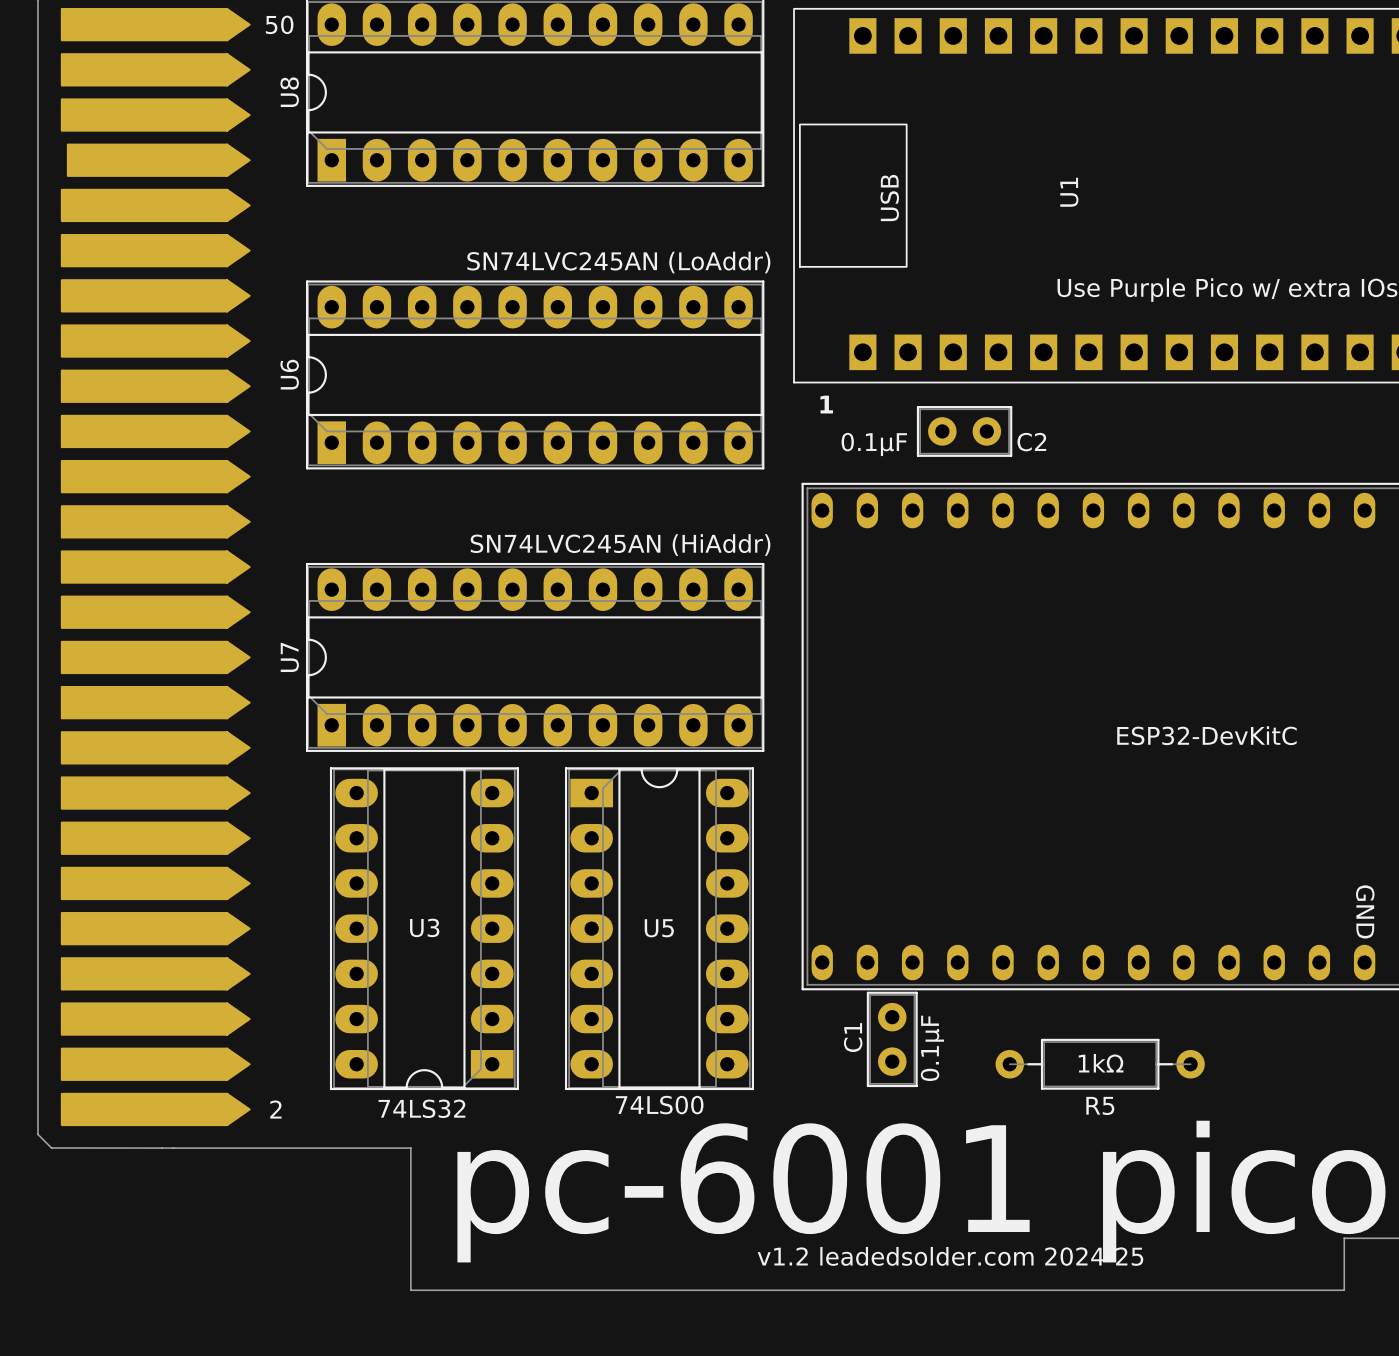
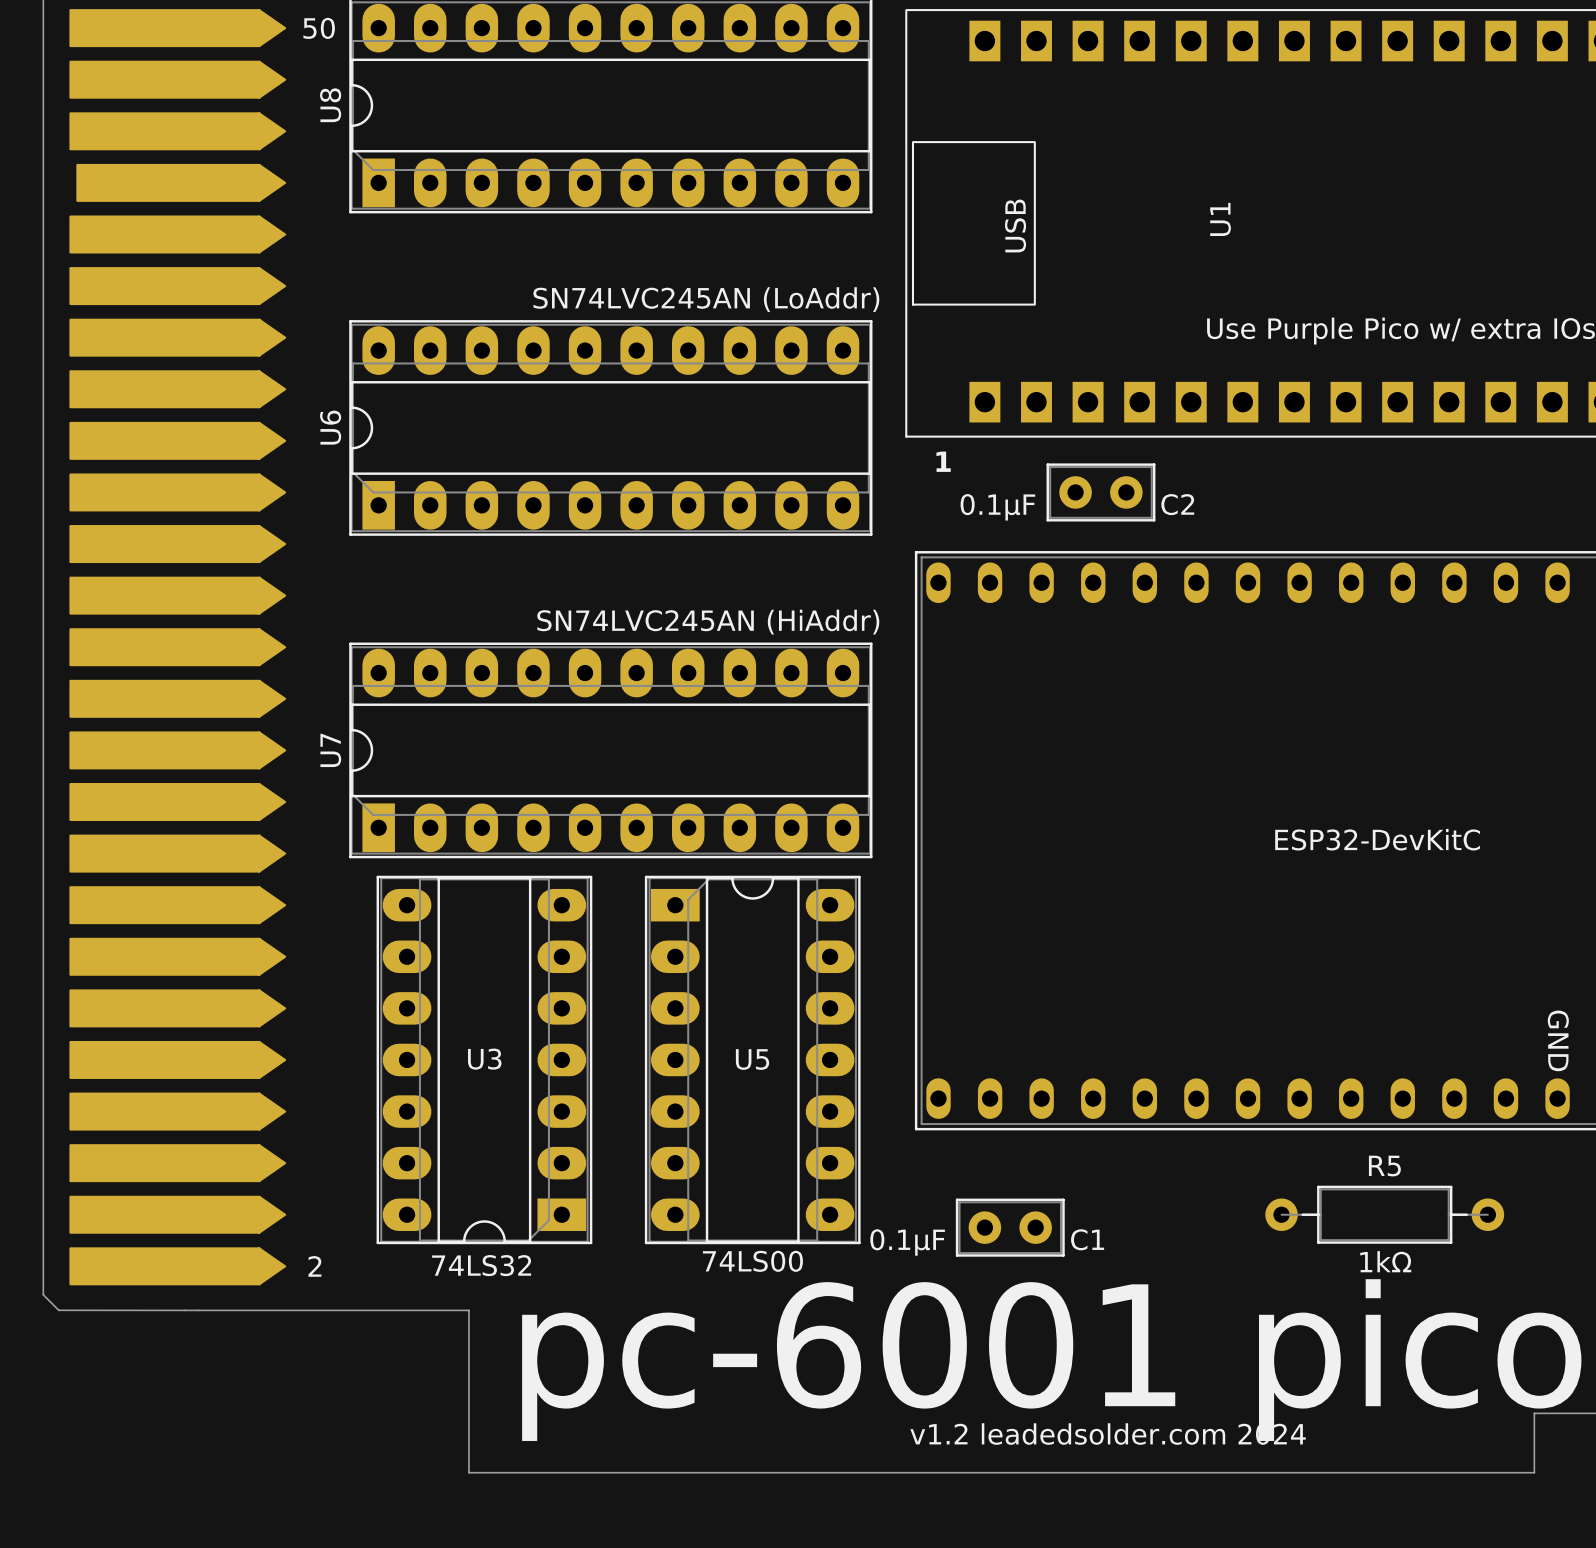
C1 name position: C1 (853, 1037) -> C1 (1087, 1239)
C1 rotation: 0° (892, 1039) -> 90° clockwise (1010, 1227)
C1 value position: 0.1µF (932, 1048) -> 0.1µF (907, 1242)
R5 value position: 1kΩ (1101, 1063) -> 1kΩ (1385, 1261)
R5 position: (1100, 1064) -> (1384, 1214)
R5 name position: R5 (1100, 1105) -> R5 (1384, 1166)
text: v1.2 leadedsolder.com 2024-25 (950, 1256) -> v1.2 leadedsolder.com 2024 (1108, 1434)

